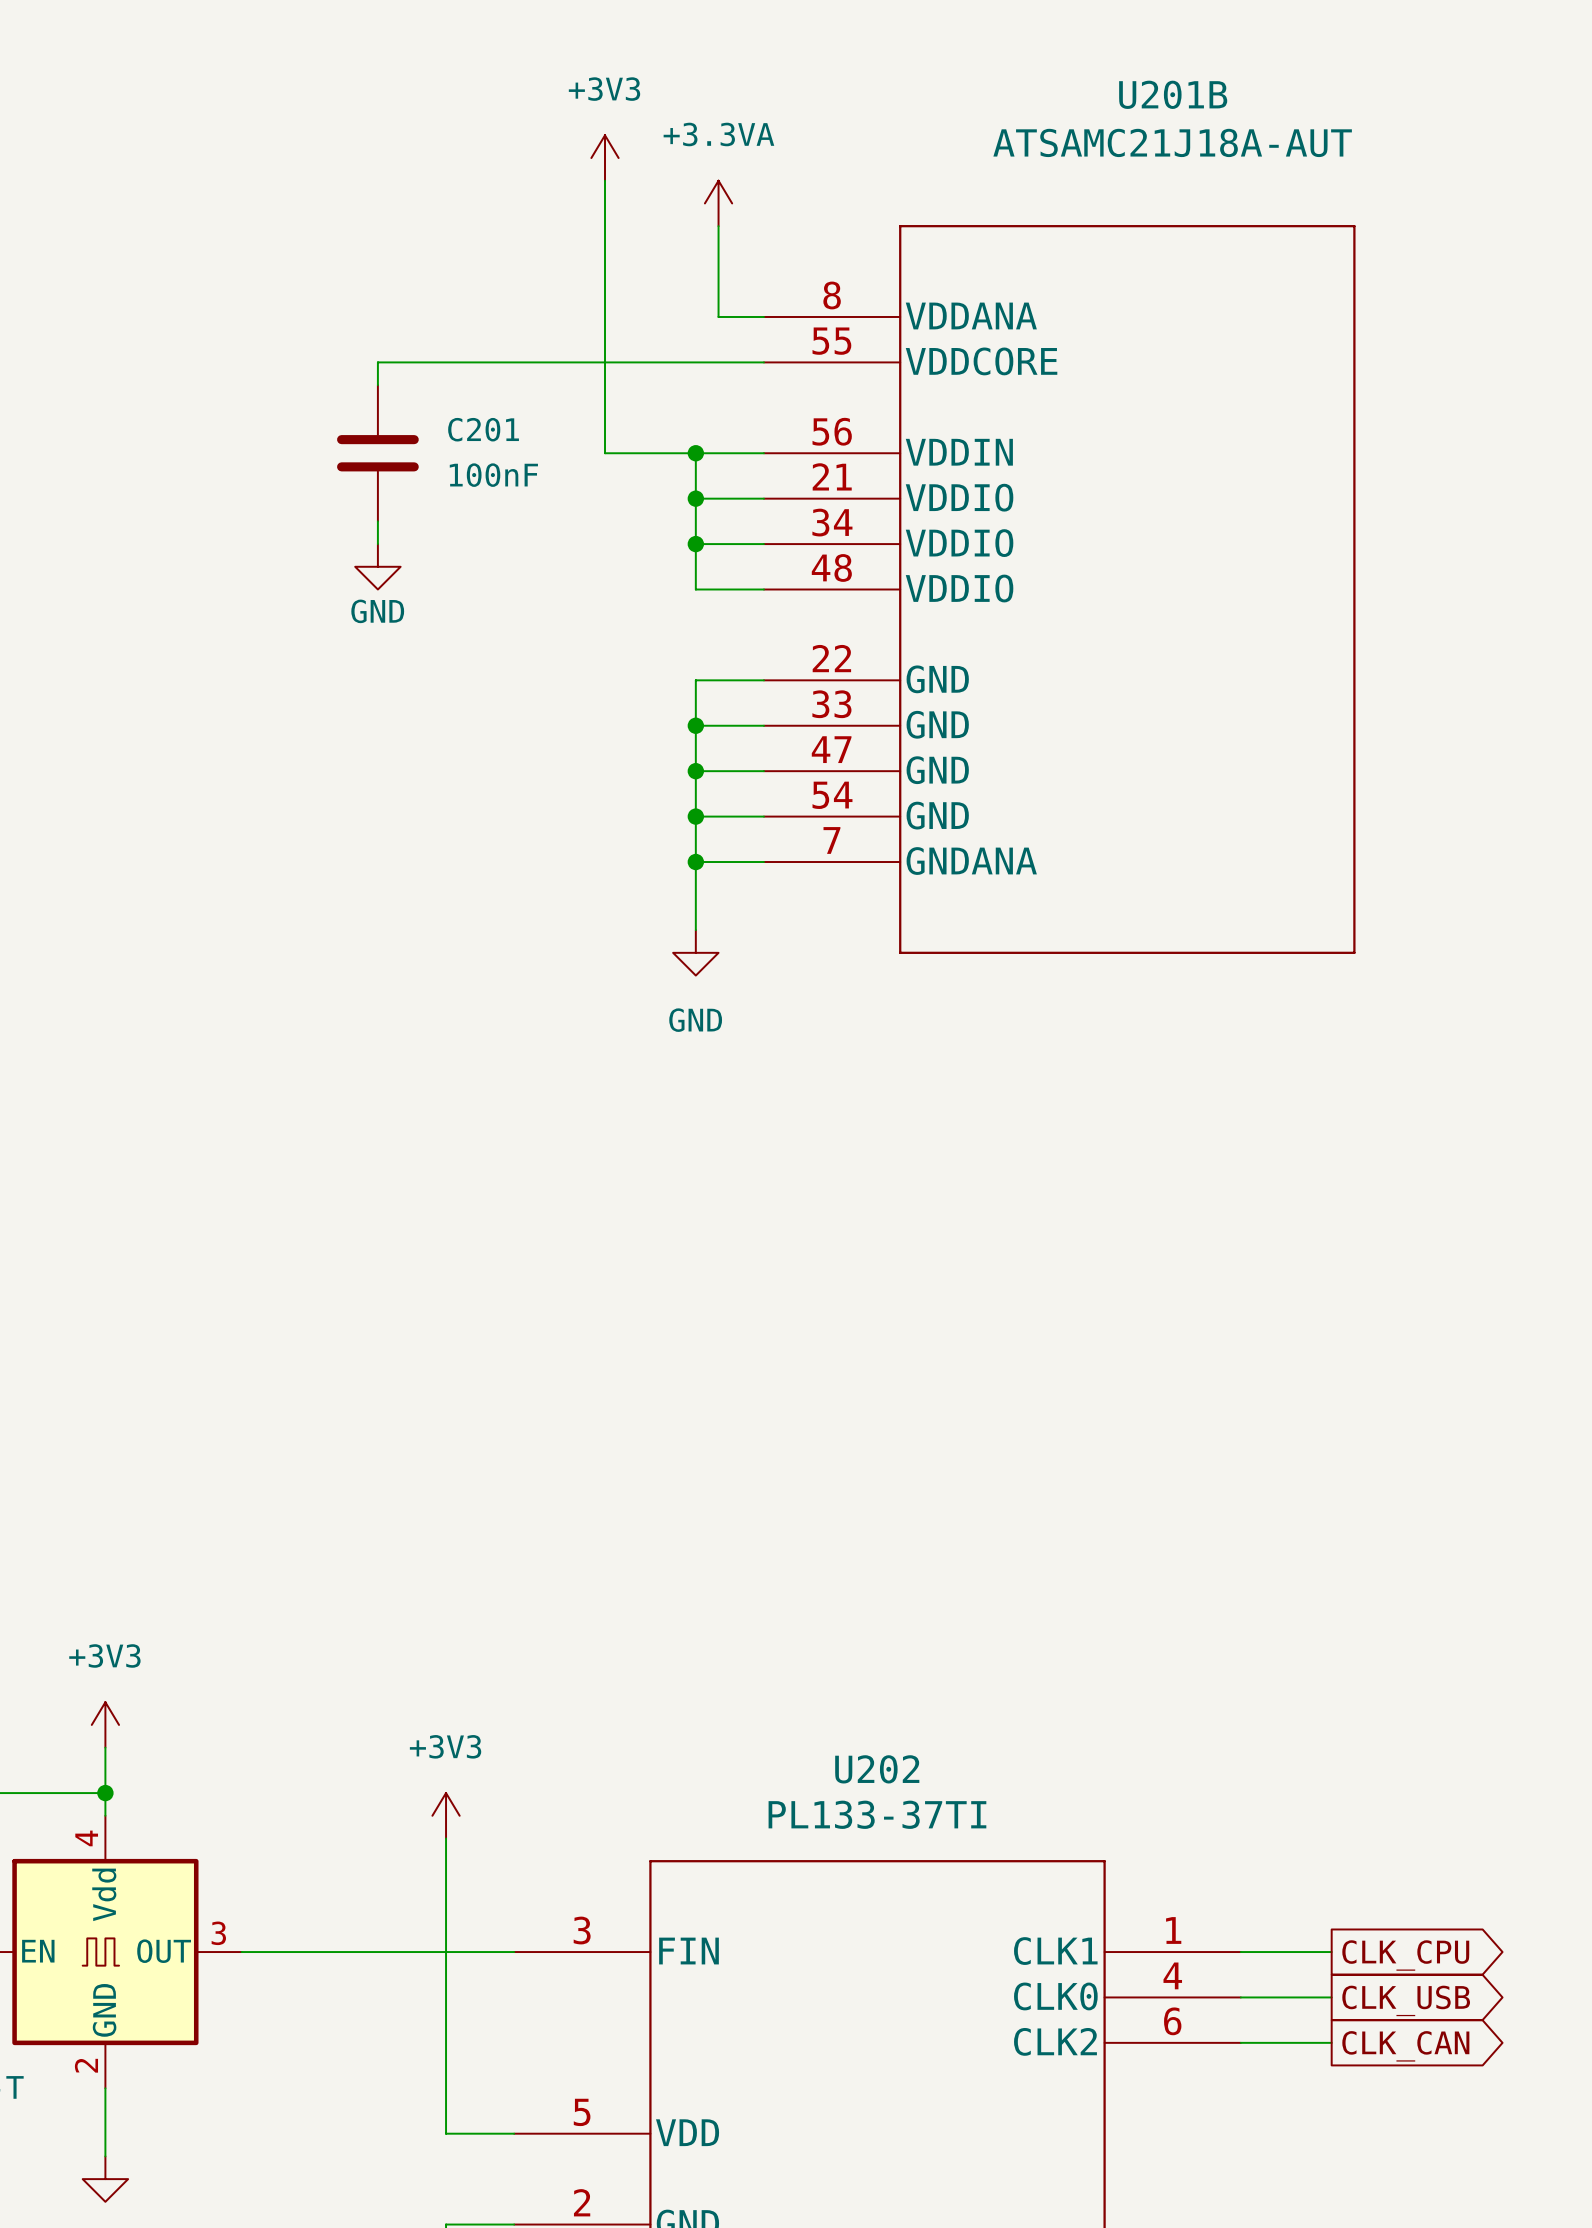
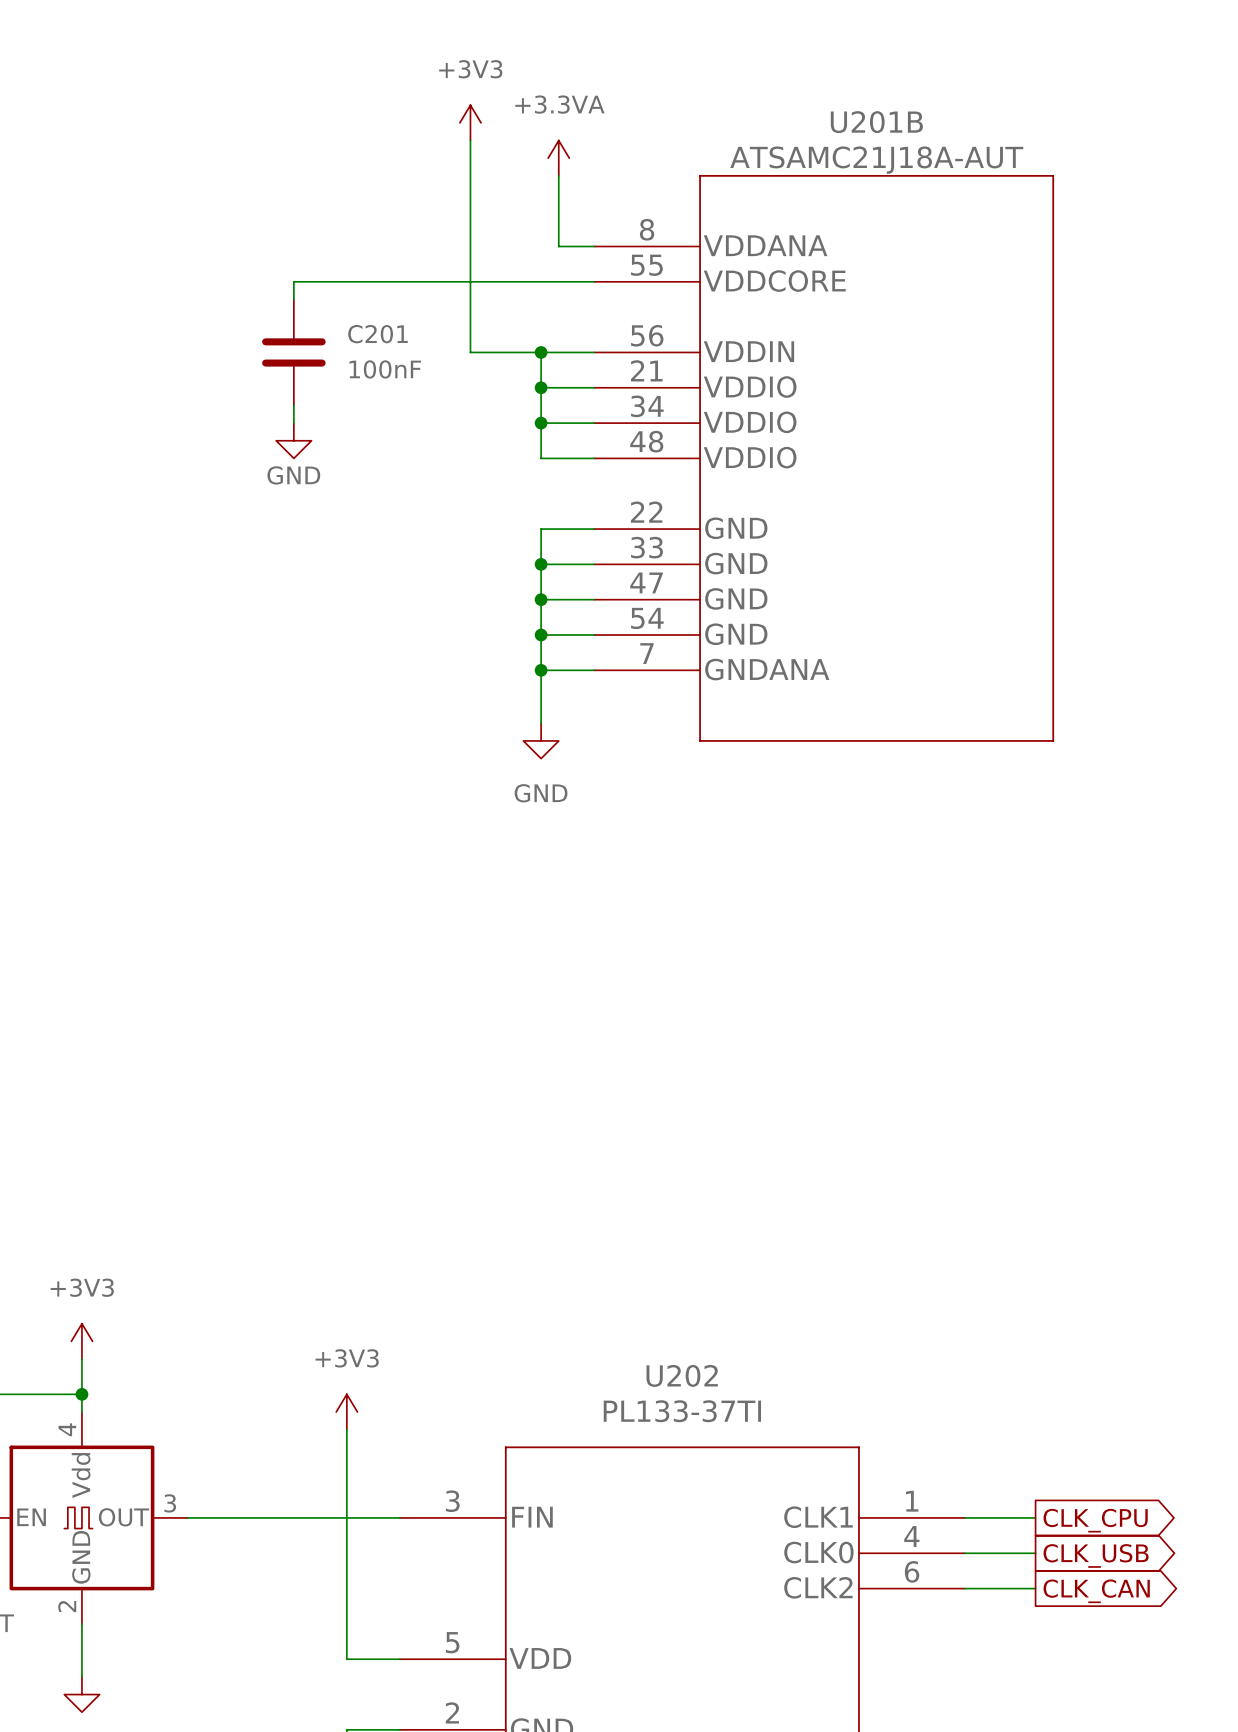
U201B name position: U201B (1173, 94) -> U201B (876, 122)
U201B value position: ATSAMC21J18A-AUT (1172, 142) -> ATSAMC21J18A-AUT (876, 160)

